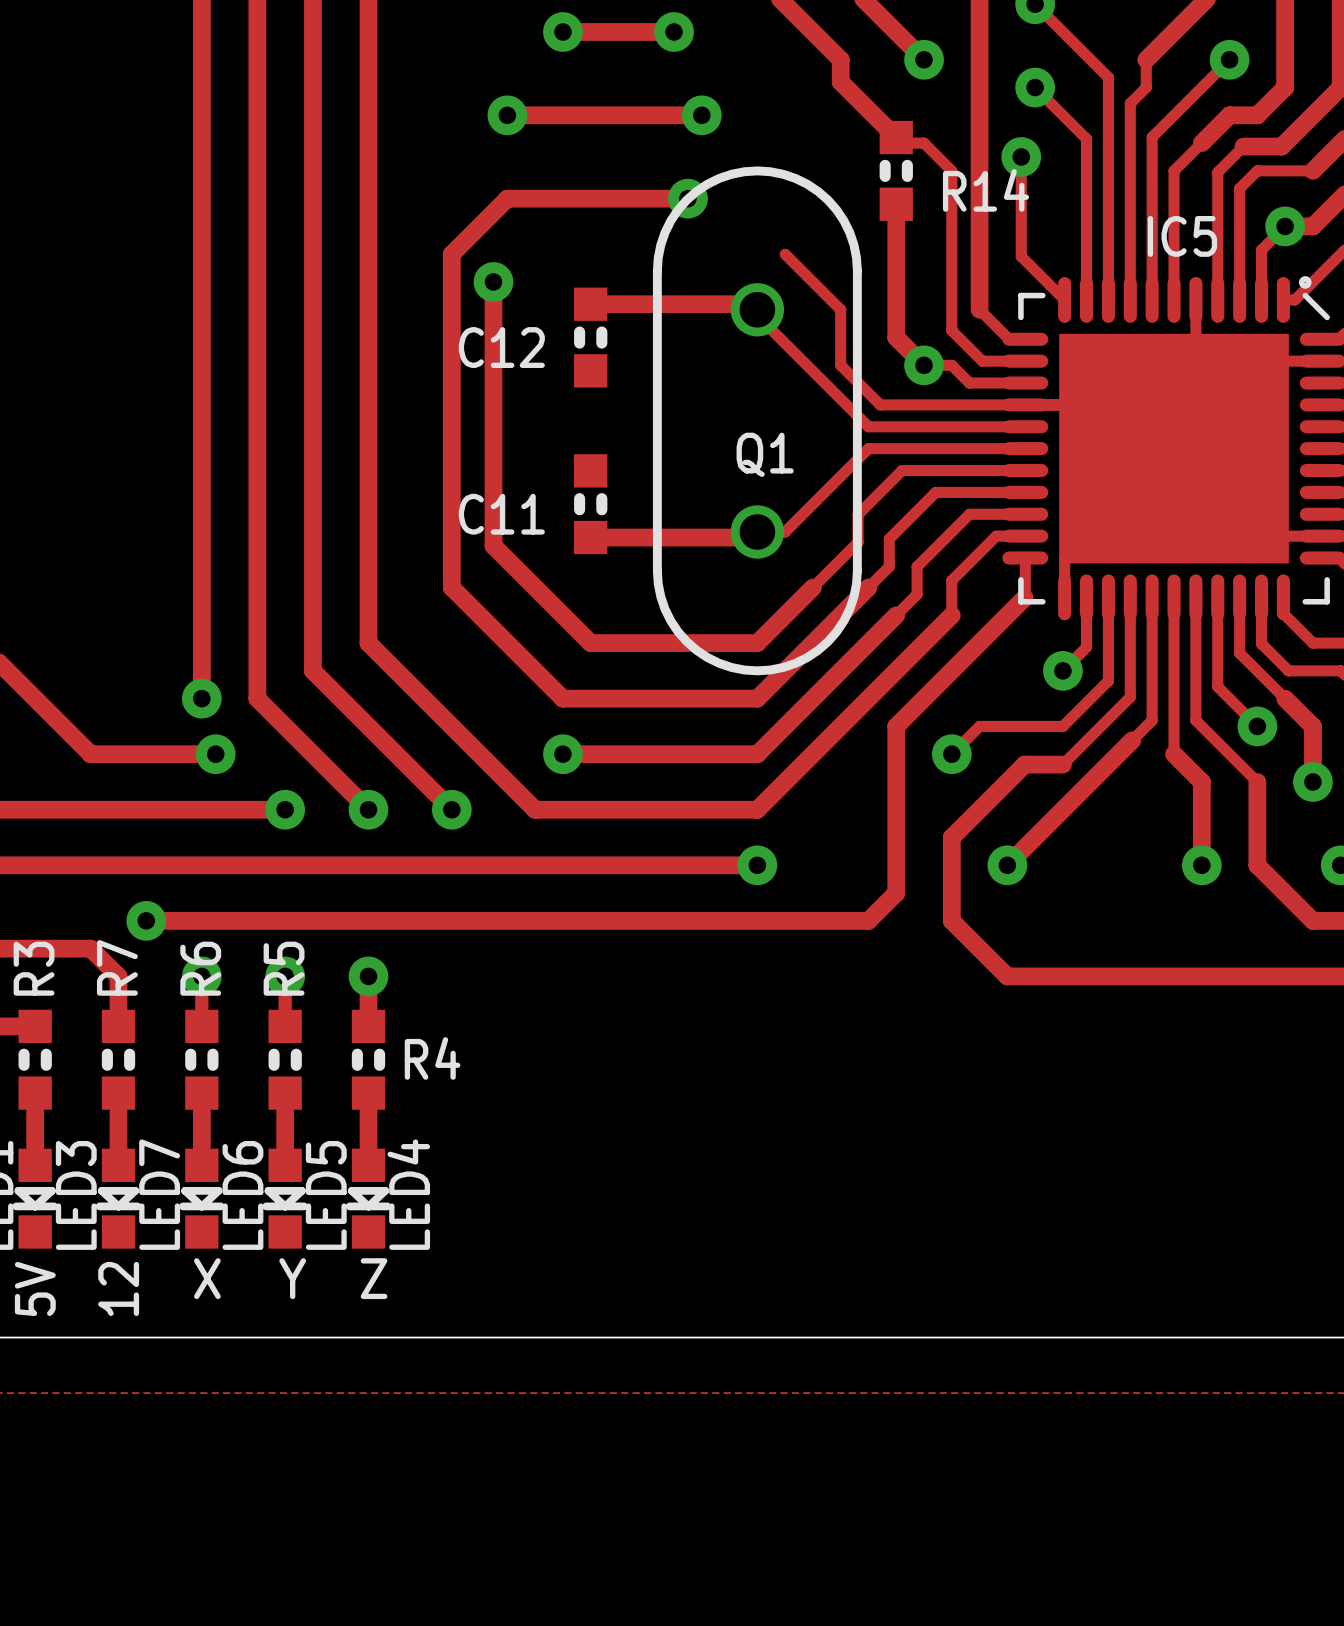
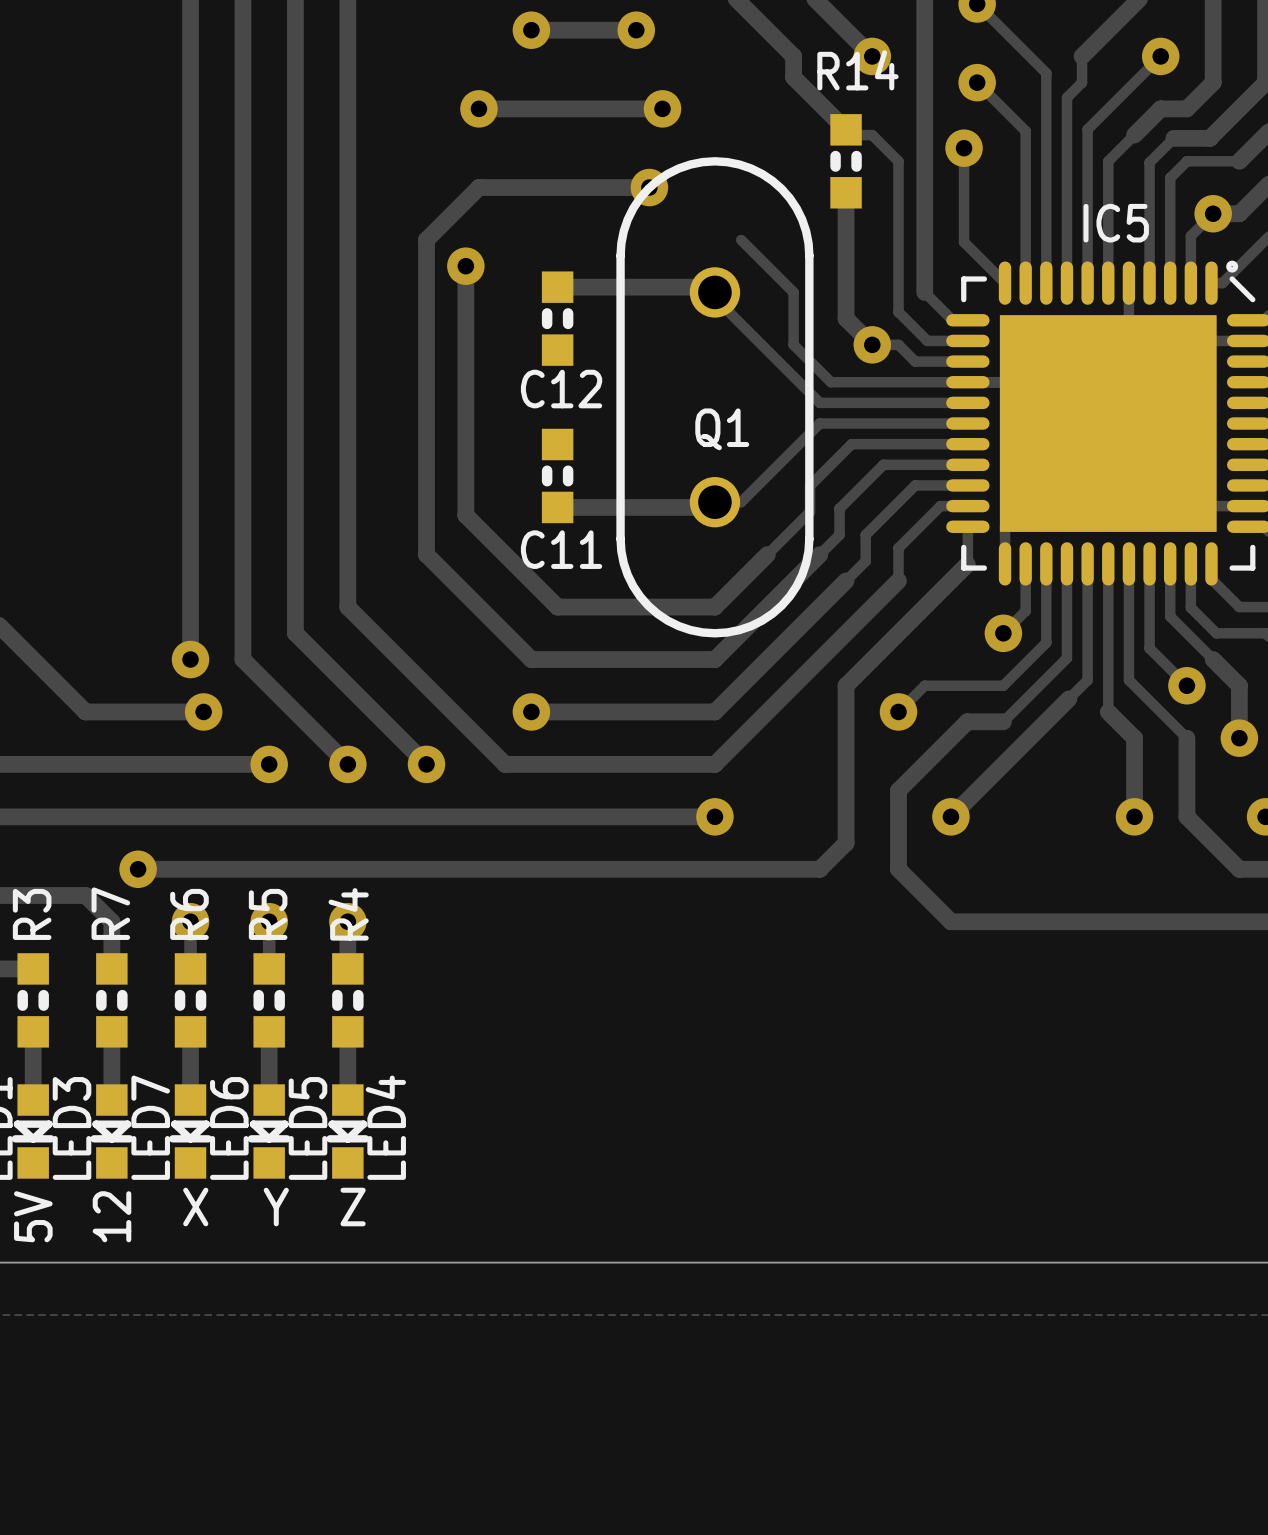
R14 name position: R14 (985, 190) -> R14 (857, 70)
C12 name position: C12 (501, 347) -> C12 (561, 389)
C11 name position: C11 (501, 514) -> C11 (561, 549)
R4 name rotation: 0° (432, 1058) -> 90° counterclockwise (348, 914)
R4 name position: R4 (432, 1058) -> R4 (348, 914)

